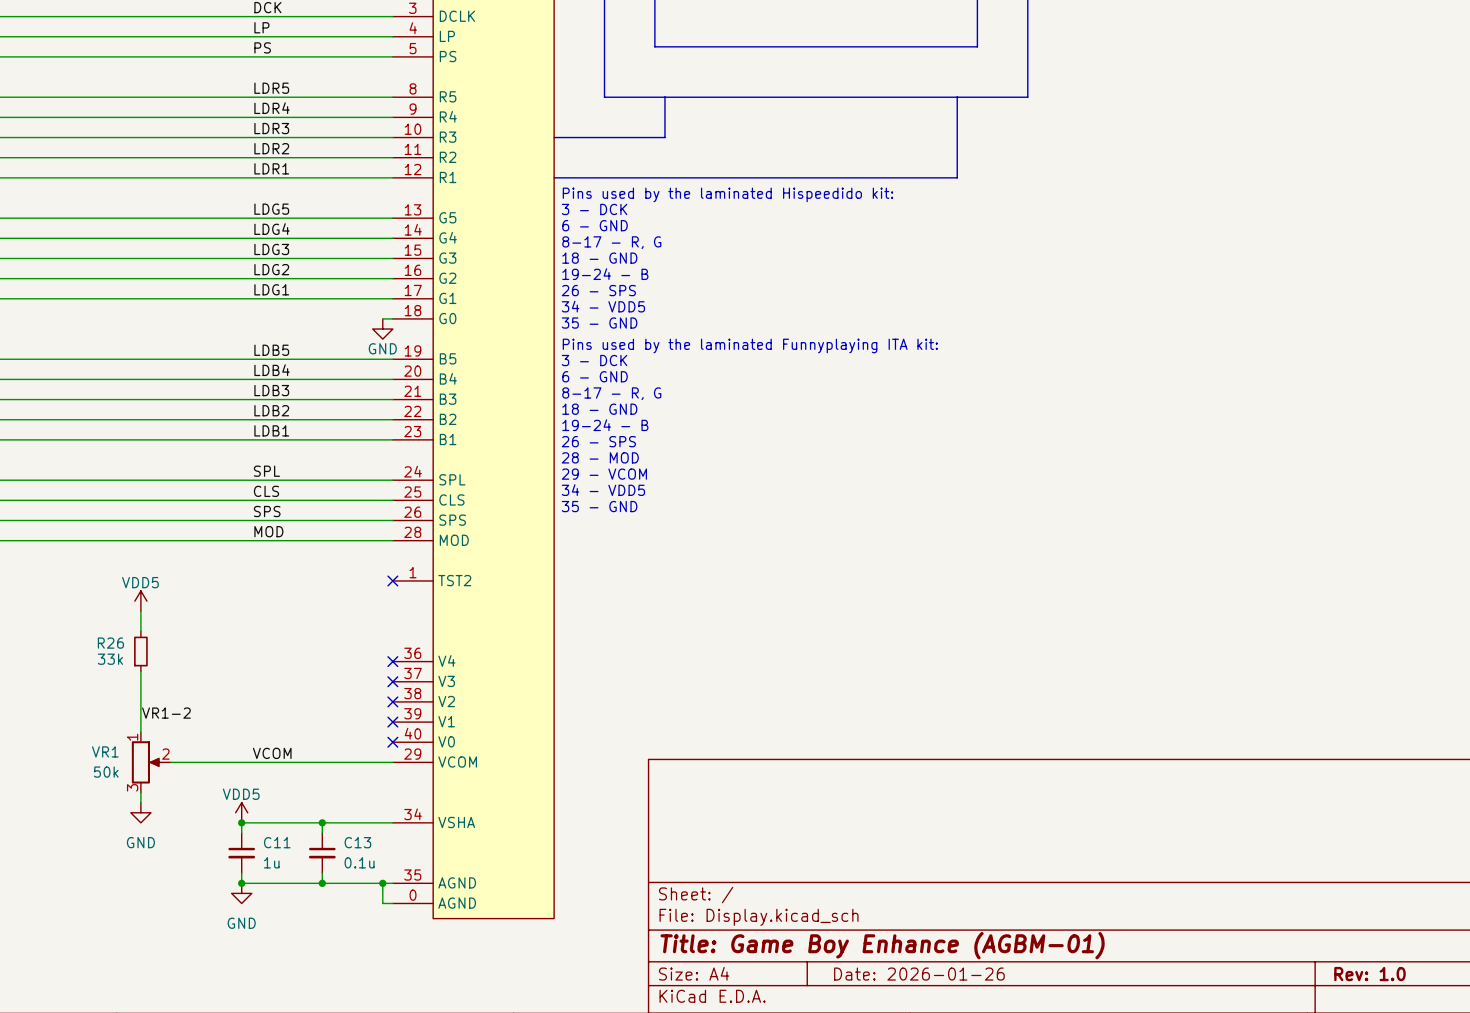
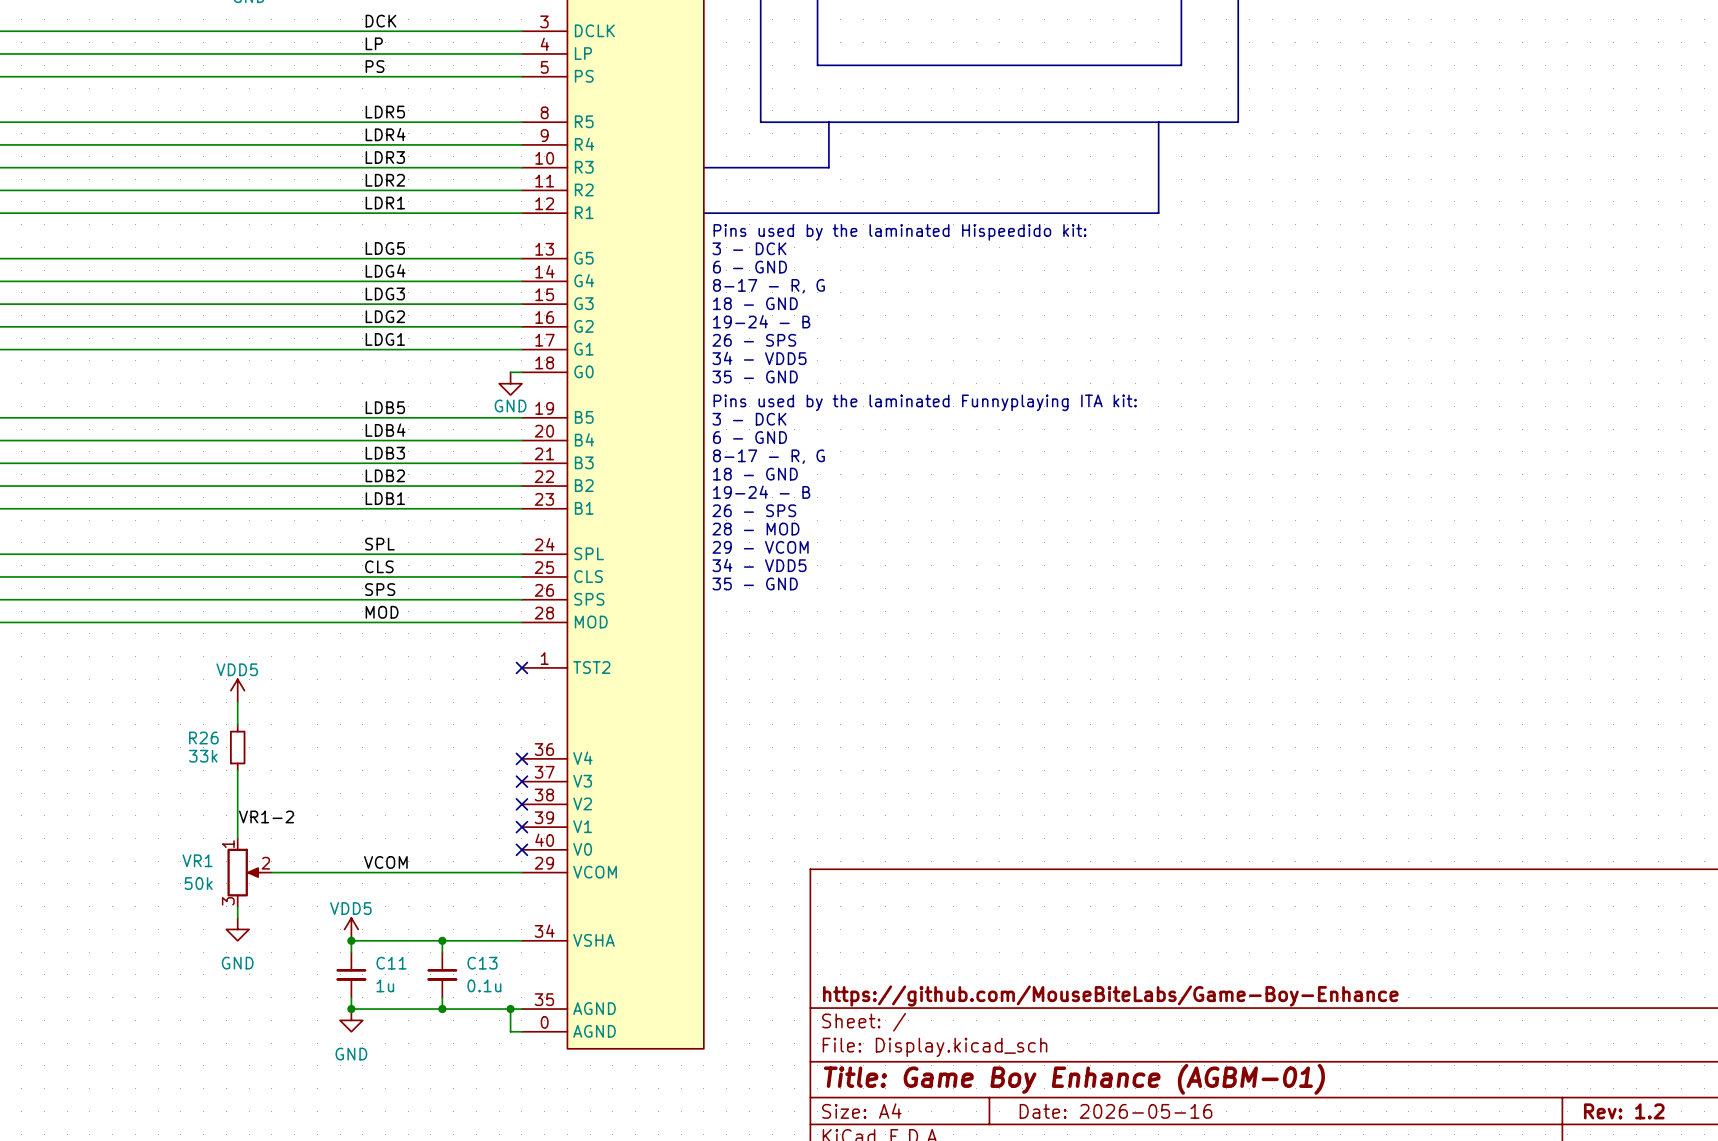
title block: none -> https://github.com/MouseBiteLabs/Game-Boy-Enhance (1110, 996)
title block: Date: 2026-01-26 (919, 974) -> Date: 2026-05-16 (1115, 1111)
title block: Rev: 1.0 (1369, 974) -> Rev: 1.2 (1624, 1111)

